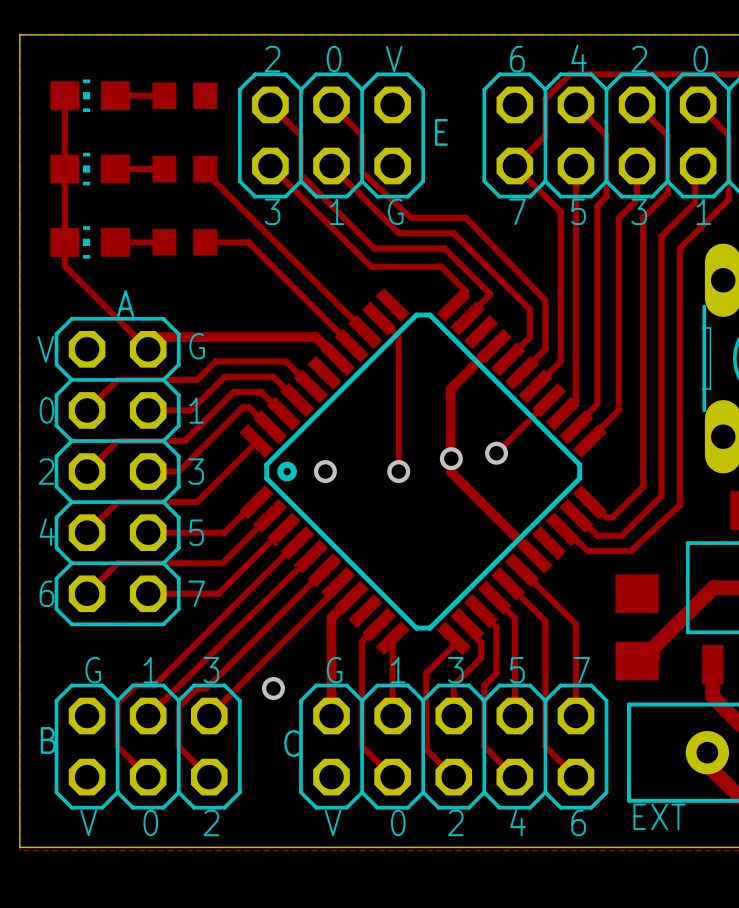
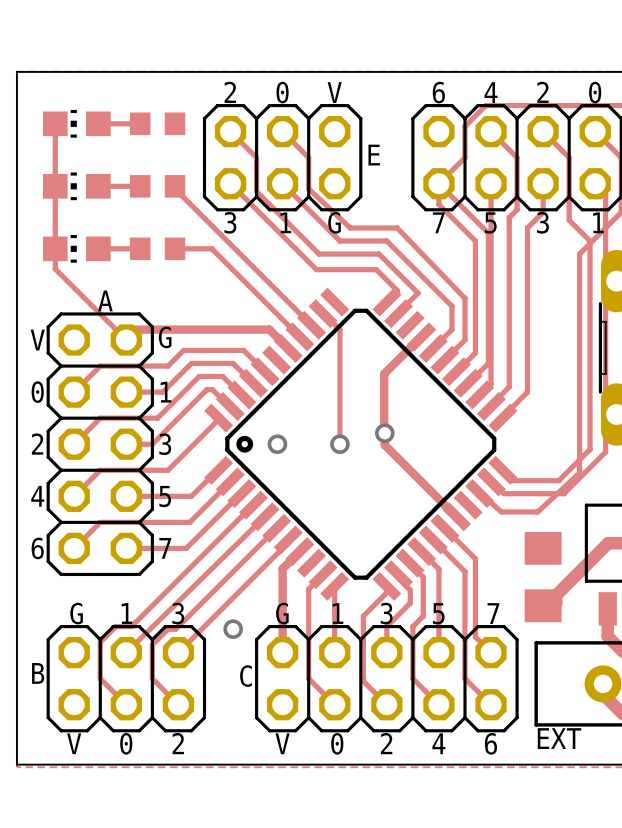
track: none -> (438, 183) (438, 204) (475, 241) (475, 353)
track: (698, 166) (695, 169) (695, 202) (661, 236) (661, 496) (621, 535) (597, 535) (591, 529) -> (595, 183) (605, 194) (605, 452) (563, 493) (504, 493)
track: (667, 193) (643, 217) (643, 486) (612, 517) (606, 517) (589, 502) -> (569, 207) (569, 220) (590, 241) (590, 449) (558, 480) (513, 480) (502, 470)
track: (560, 211) (560, 361) (557, 364) -> (478, 222) (488, 233) (488, 363) (468, 383)
track: (549, 400) (496, 453) -> none
via: (496, 453) -> none
track: (557, 606) (575, 624) (575, 716) -> (475, 558) (475, 636) (491, 652)

